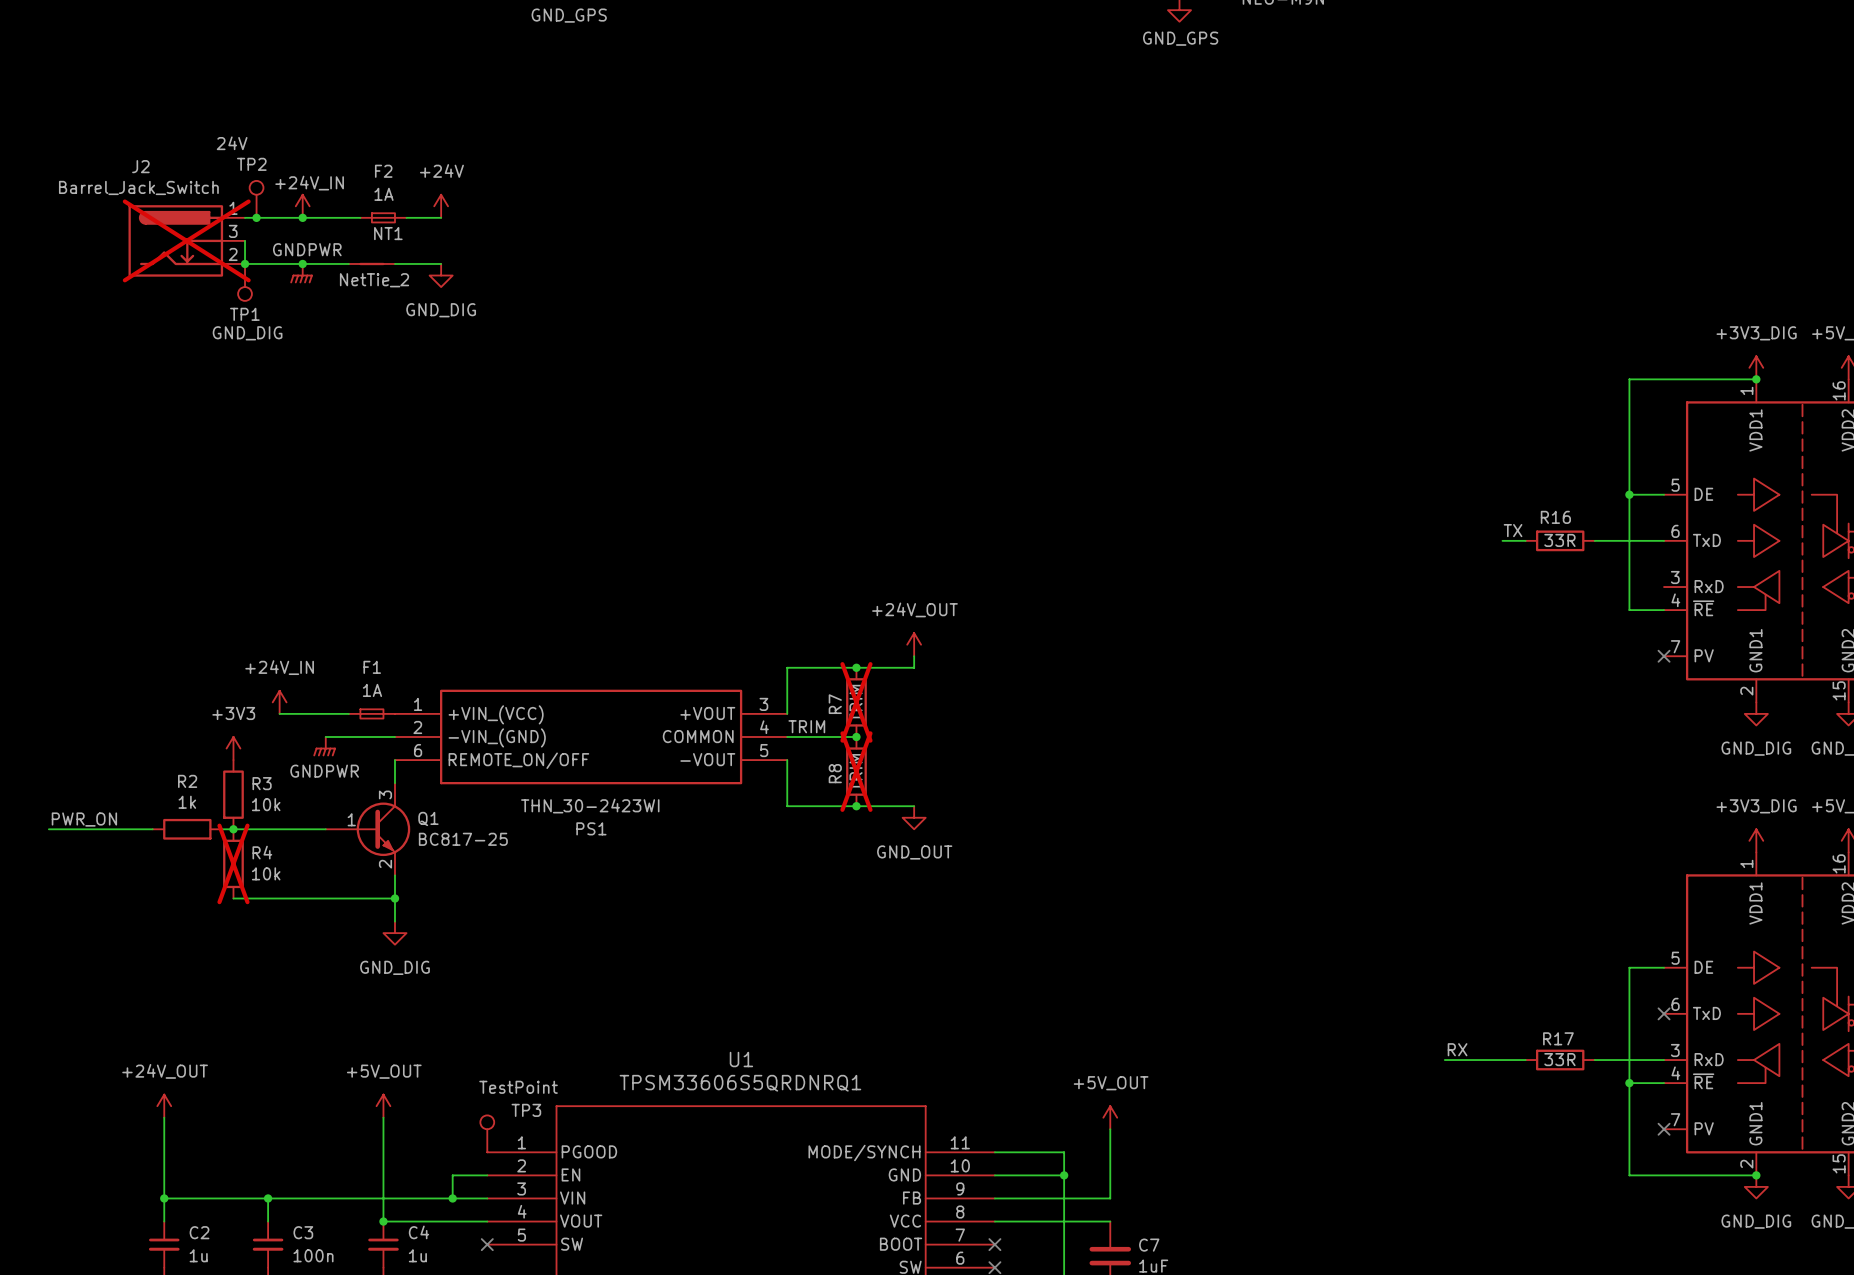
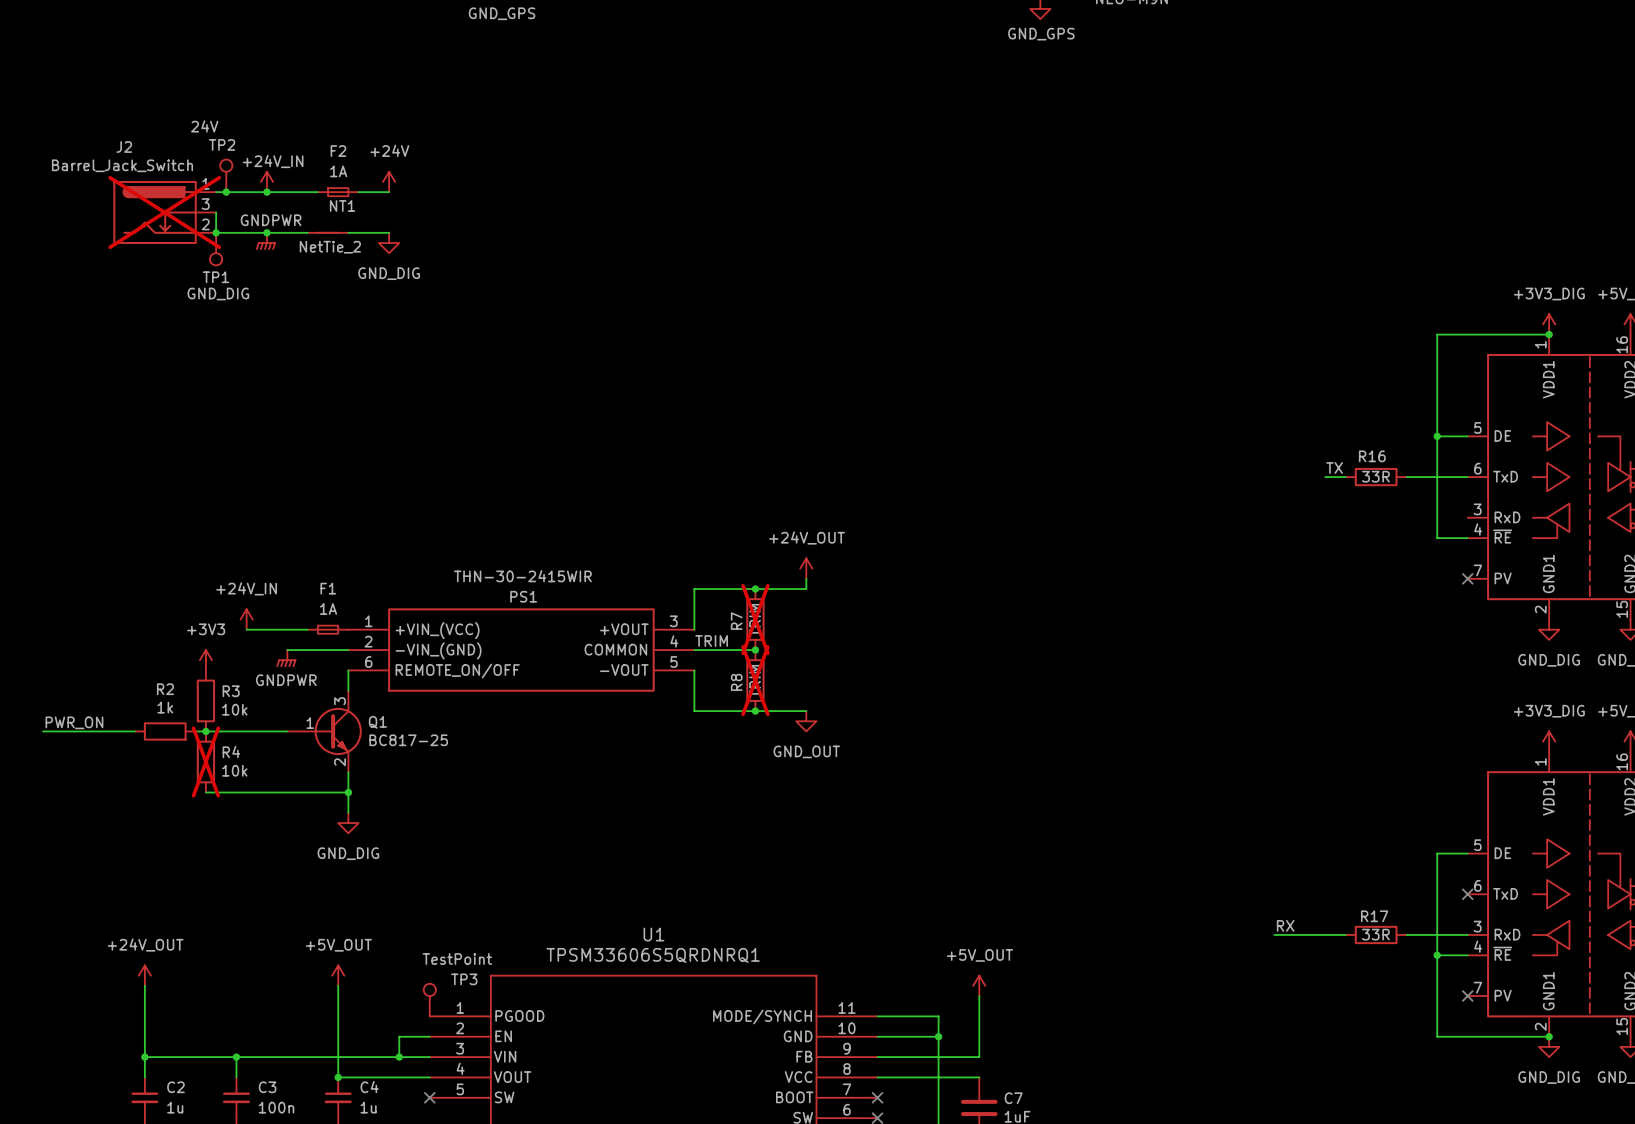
PS1 value: THN_30-2423WI (590, 806) -> THN-30-2415WIR (522, 576)
PS1 name position: PS1 (591, 828) -> PS1 (523, 596)

